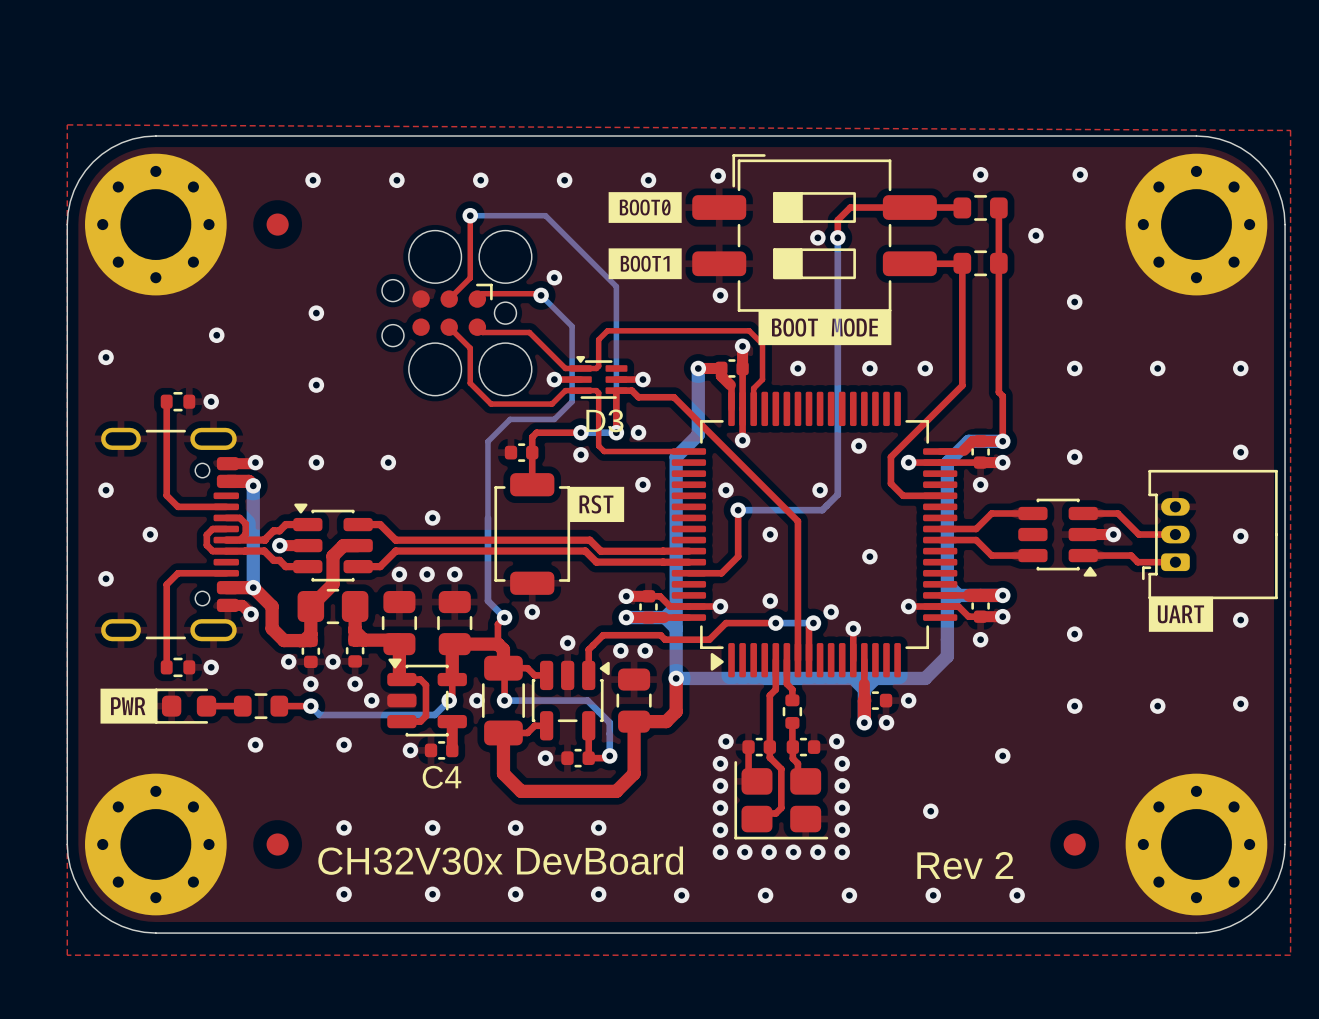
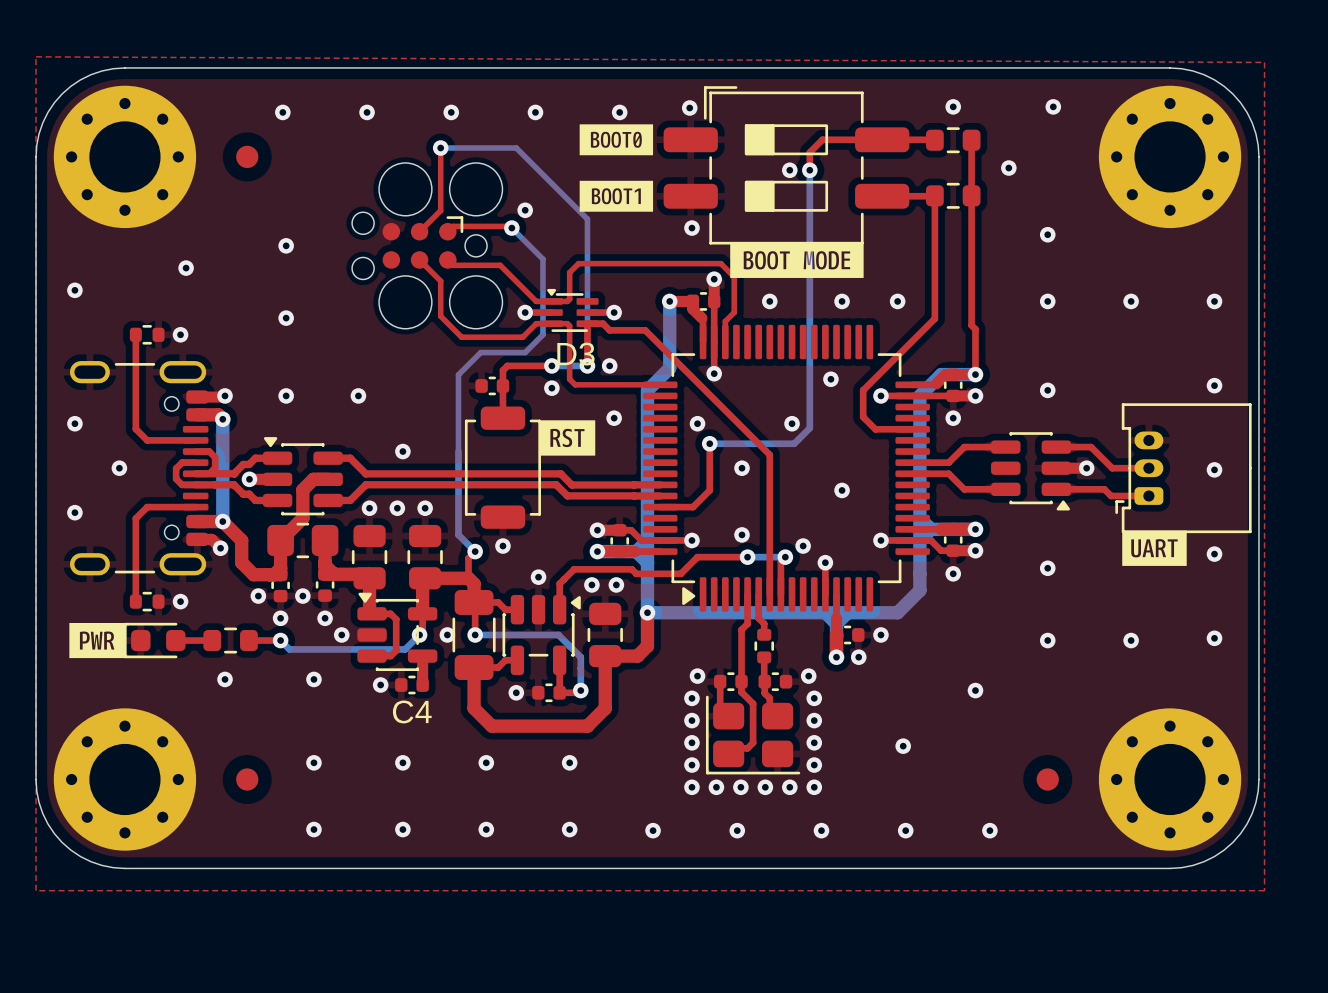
text: CH32V30x DevBoard (500, 860) -> none
text: Rev 2 (965, 865) -> none

